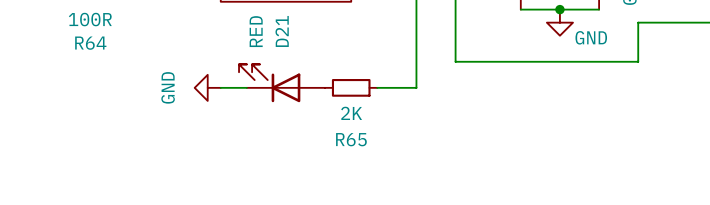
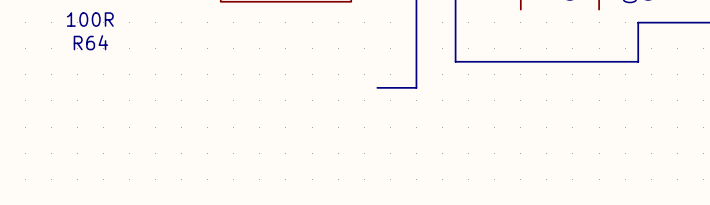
wire: (520, 9) (599, 9) -> none
junction: (559, 9) -> none
power symbol: GND (559, 22) -> none
D21: RED (282, 83) -> none
power symbol: GND (207, 87) -> none
wire: (220, 87) (246, 87) -> none
R65: 2K (351, 87) -> none

